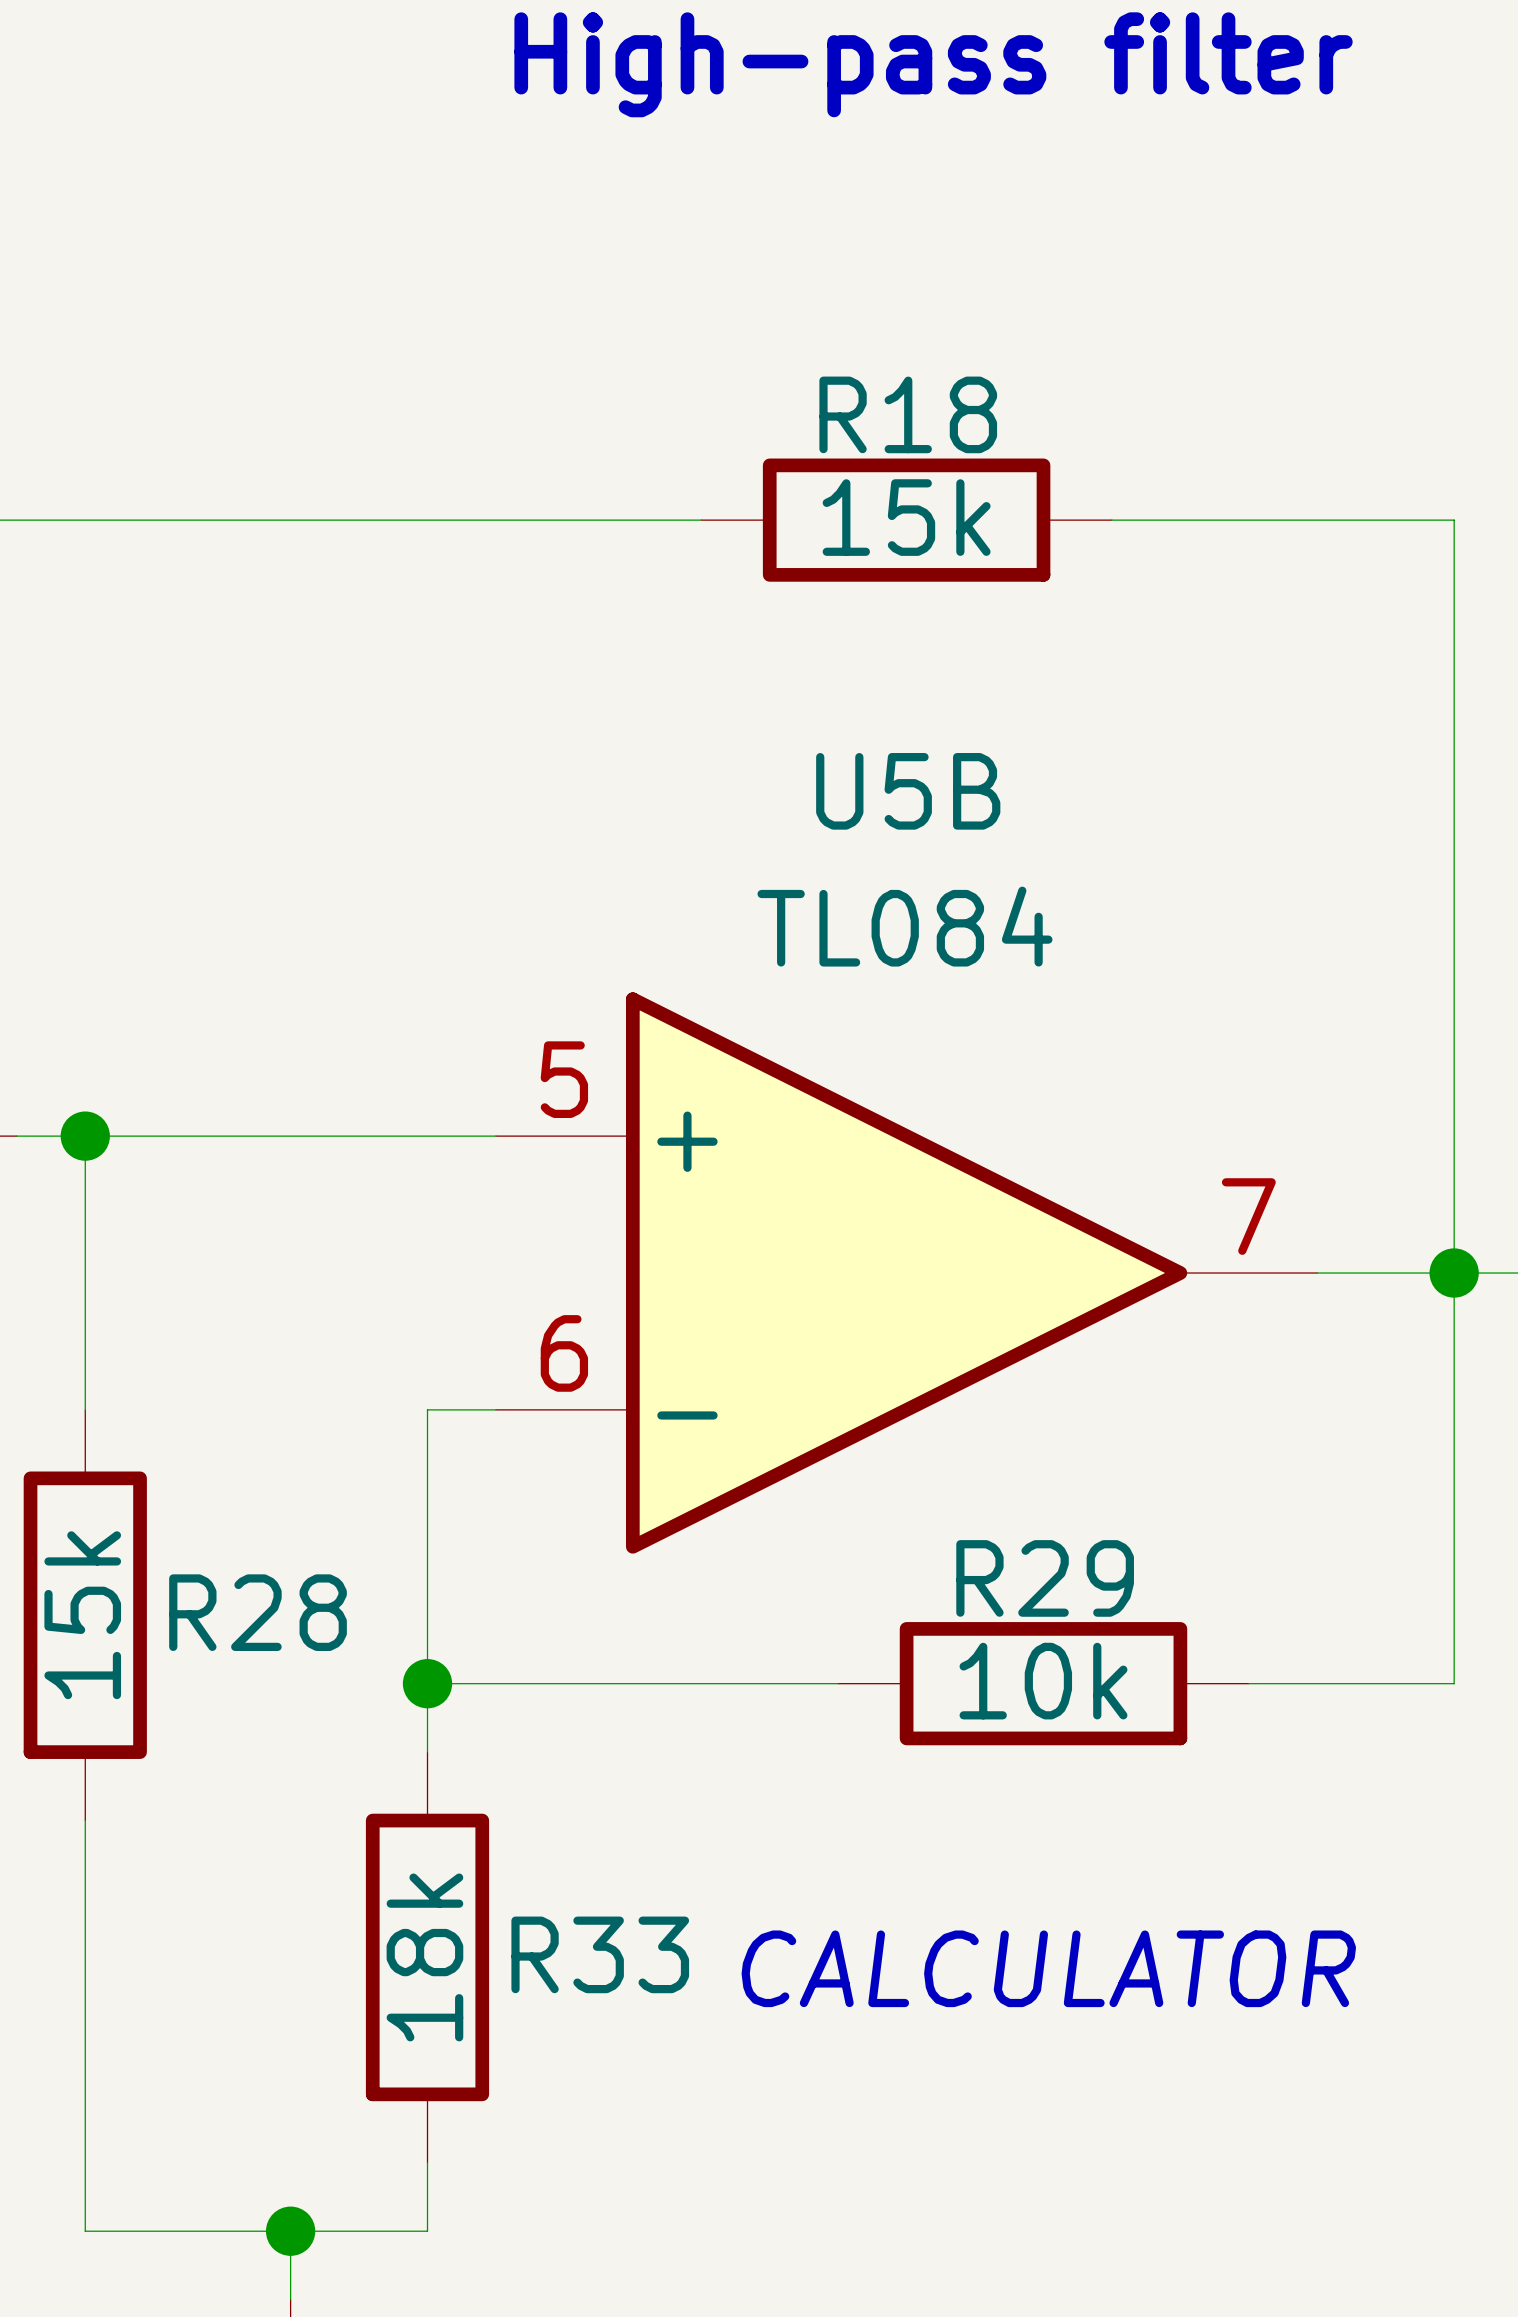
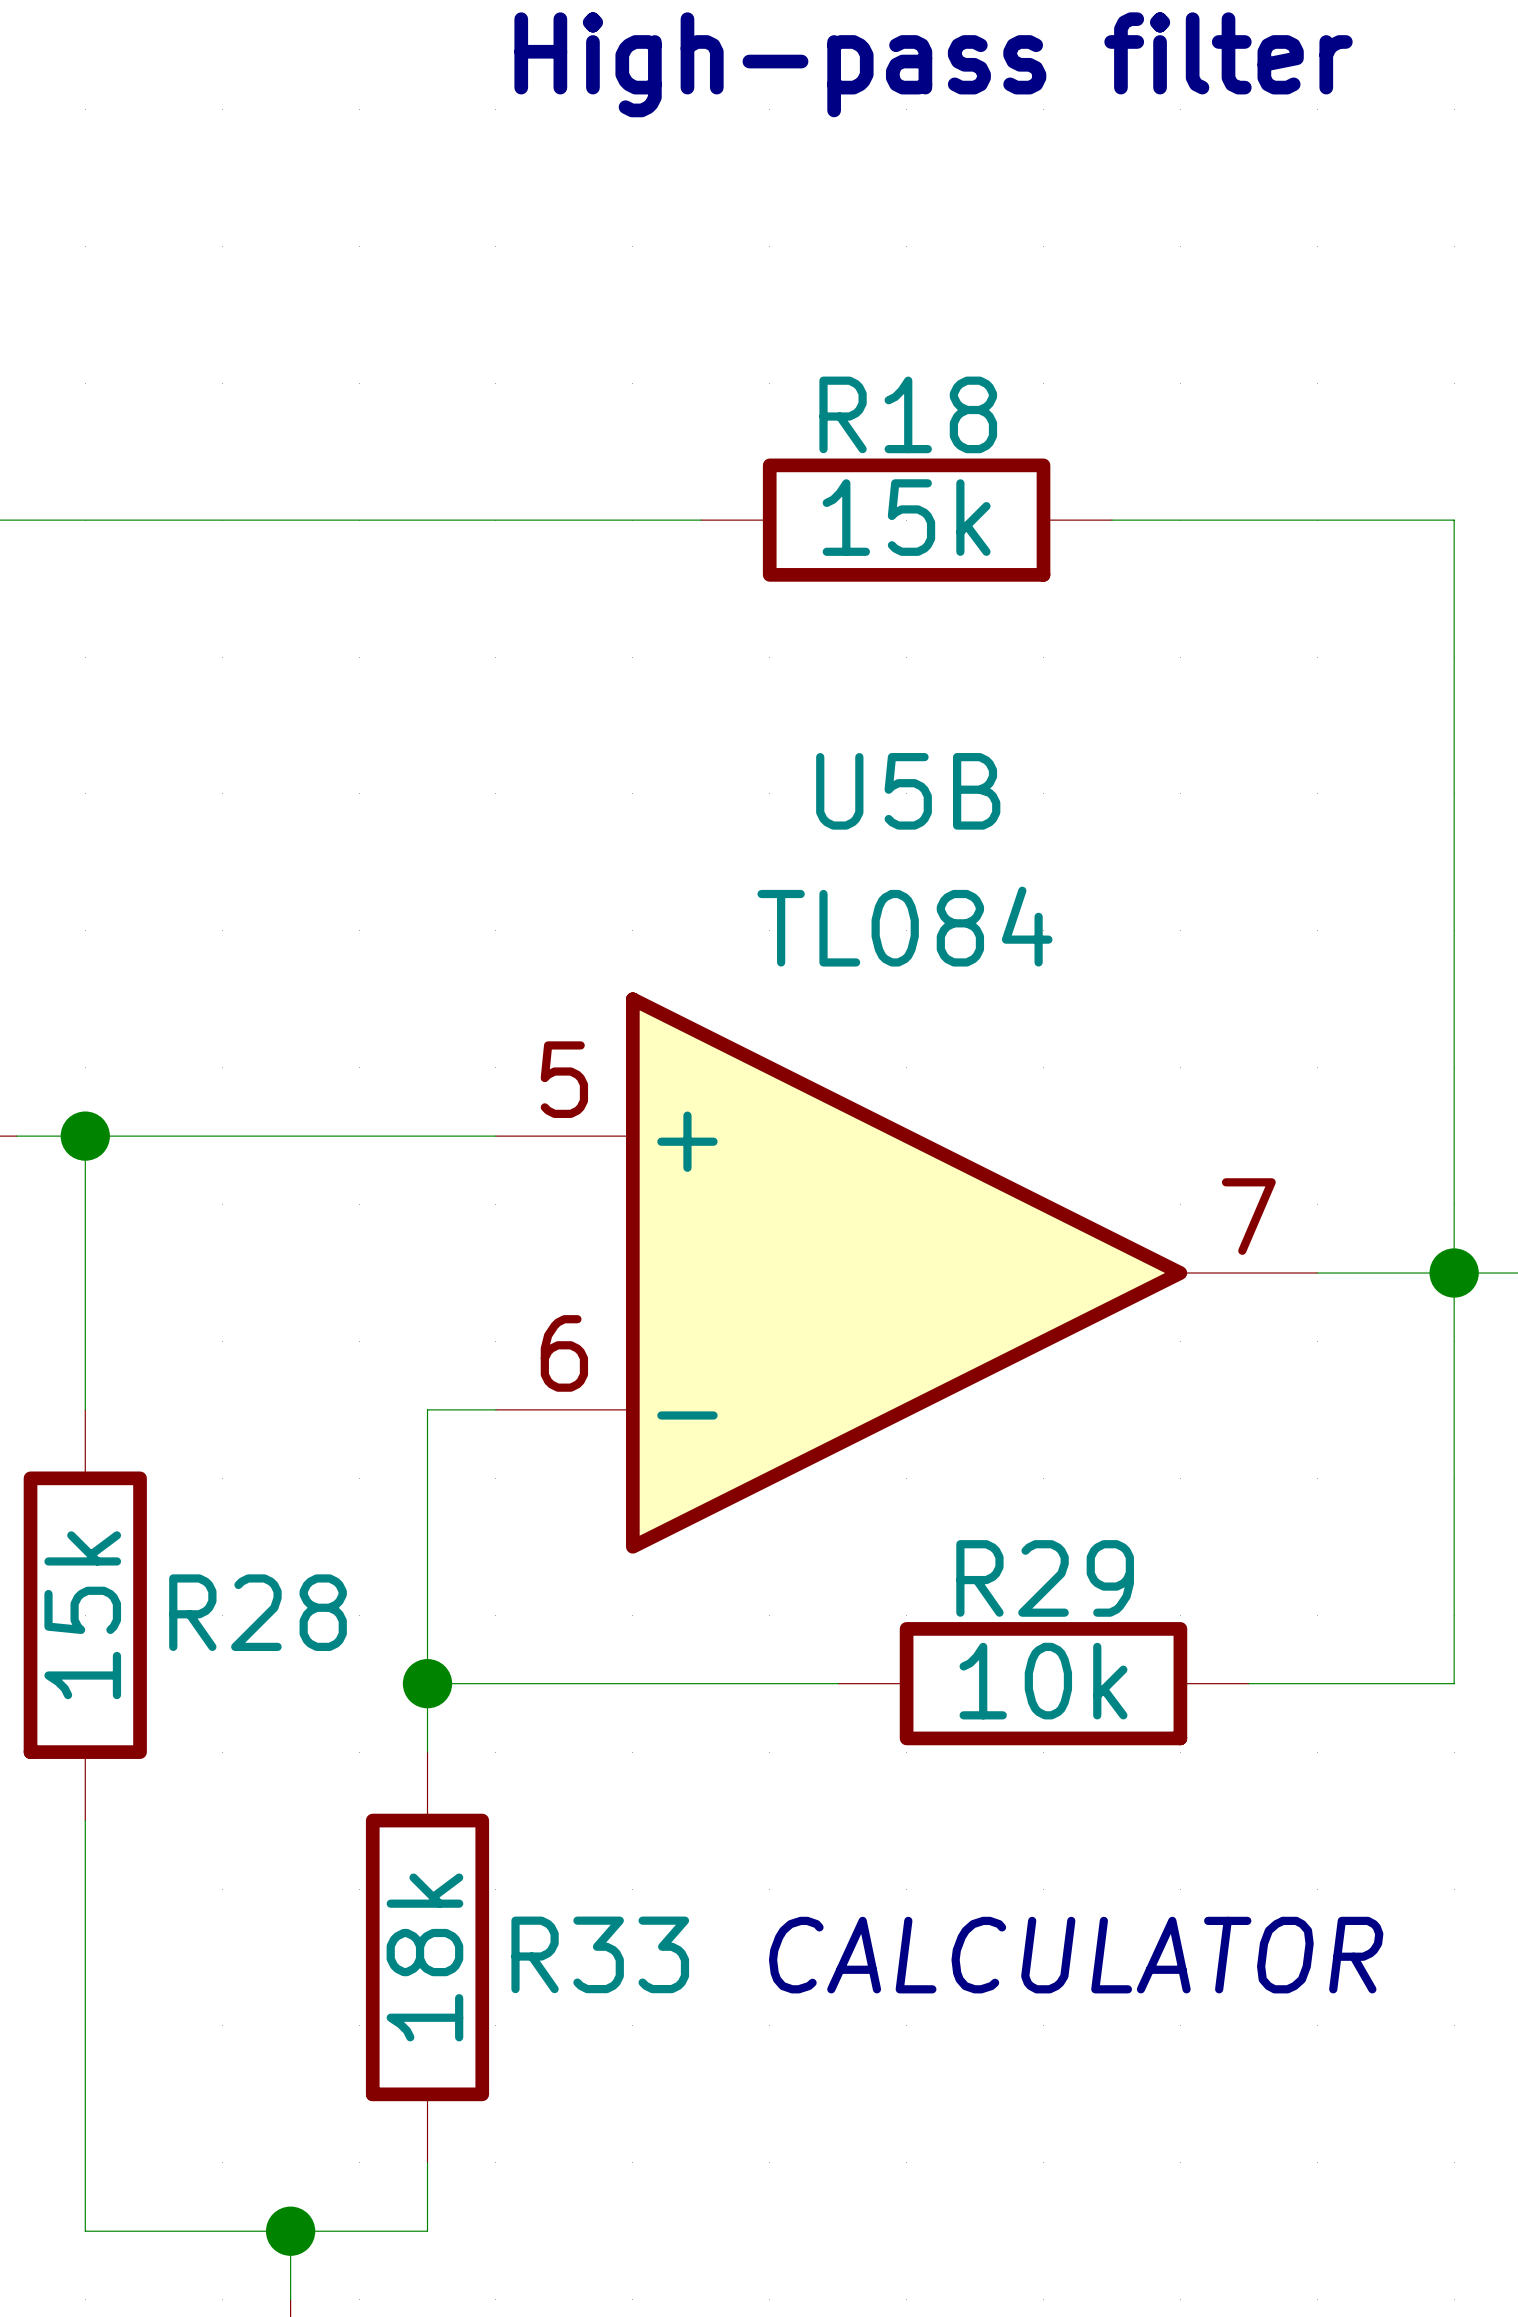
text position: CALCULATOR (1048, 1968) -> CALCULATOR (1076, 1955)

